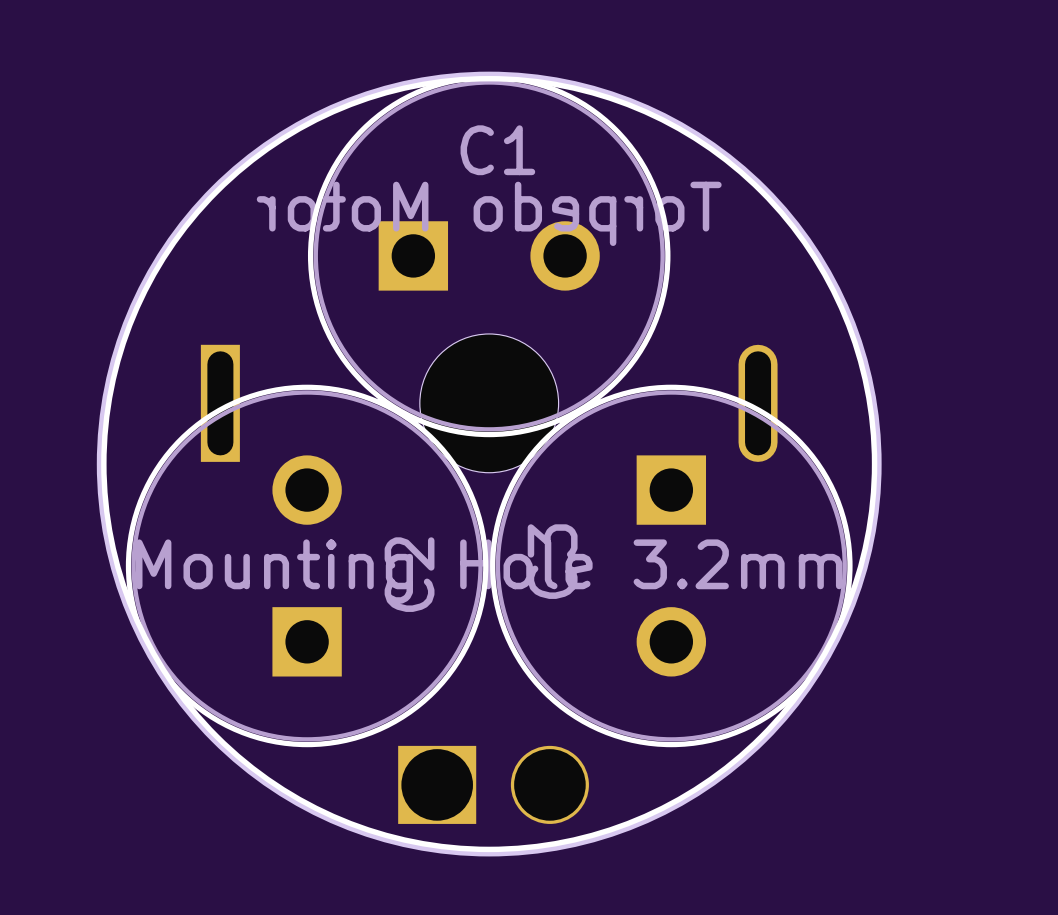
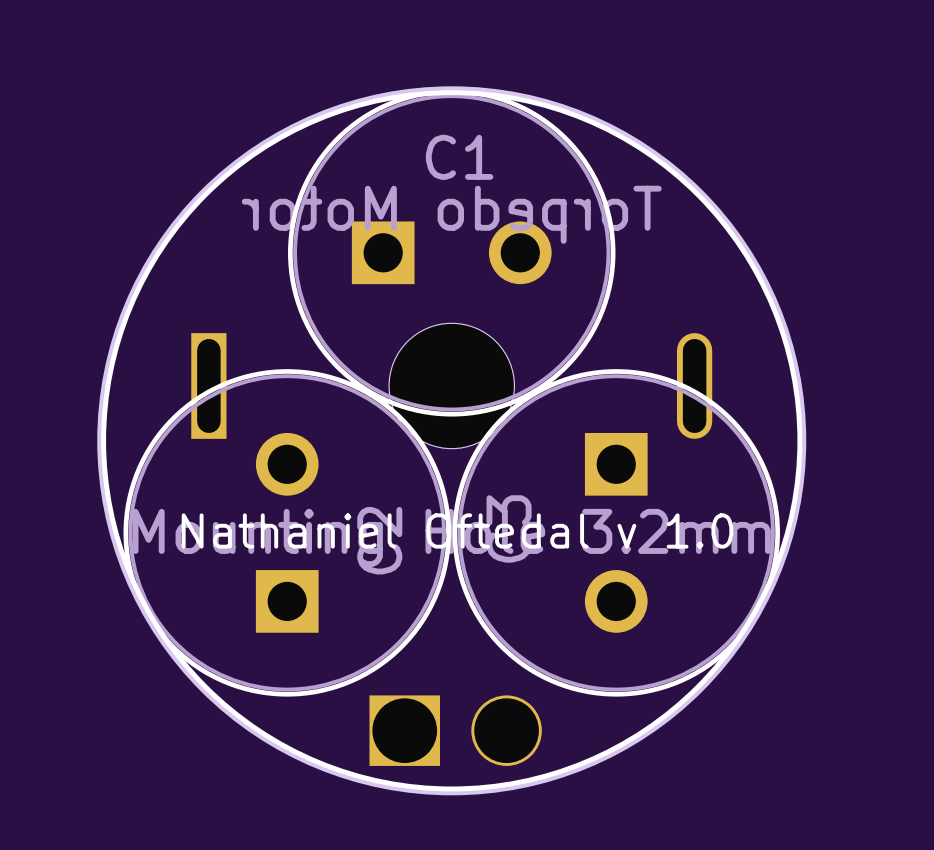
text: none -> Nathaniel Oftedal v 1.0 (457, 530)

